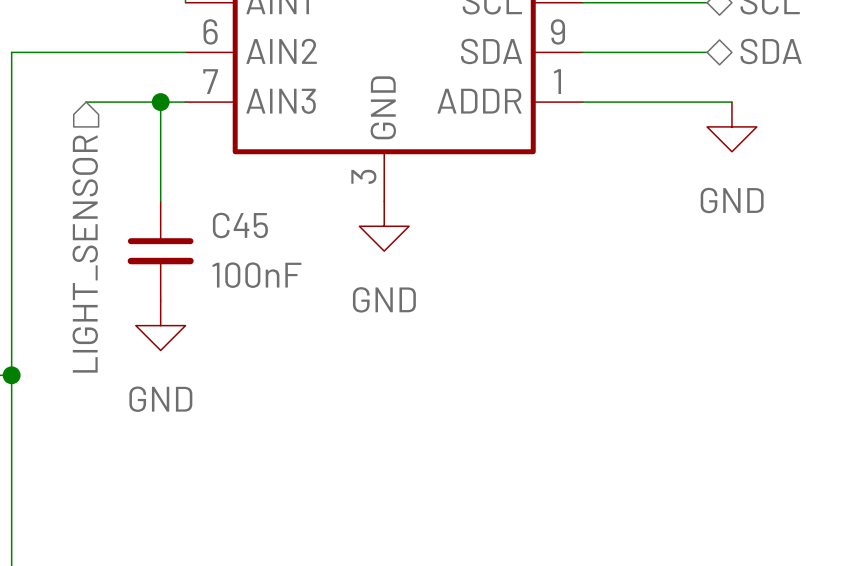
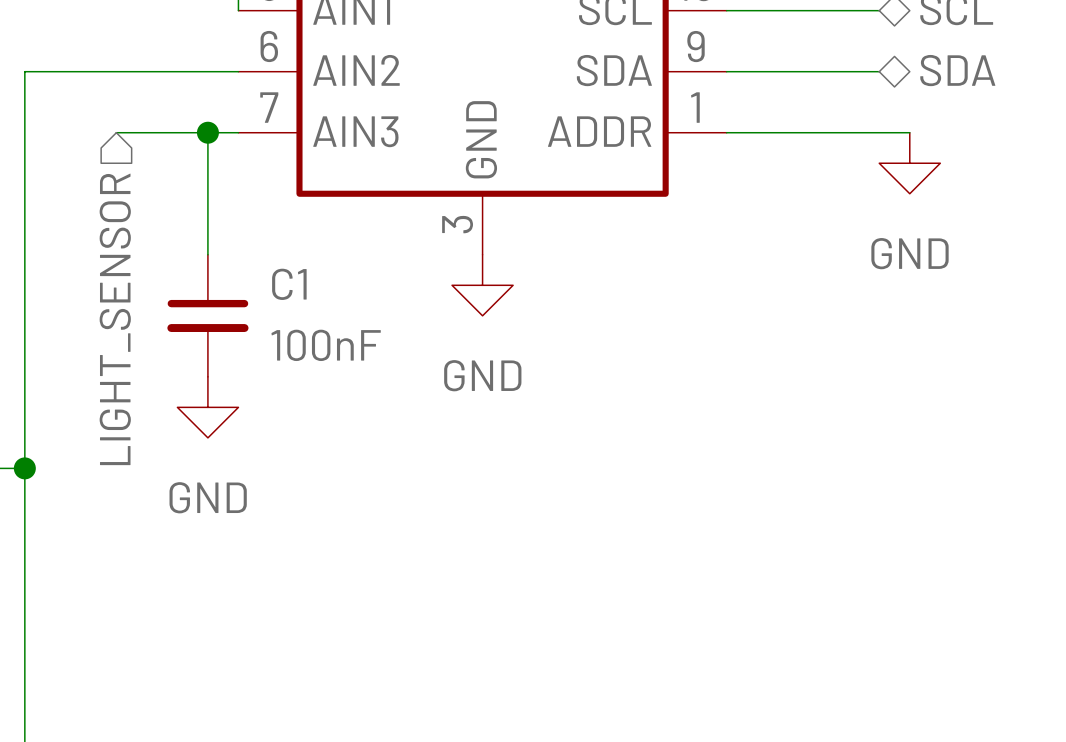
C45 name: C45 (240, 225) -> C1 (289, 284)

